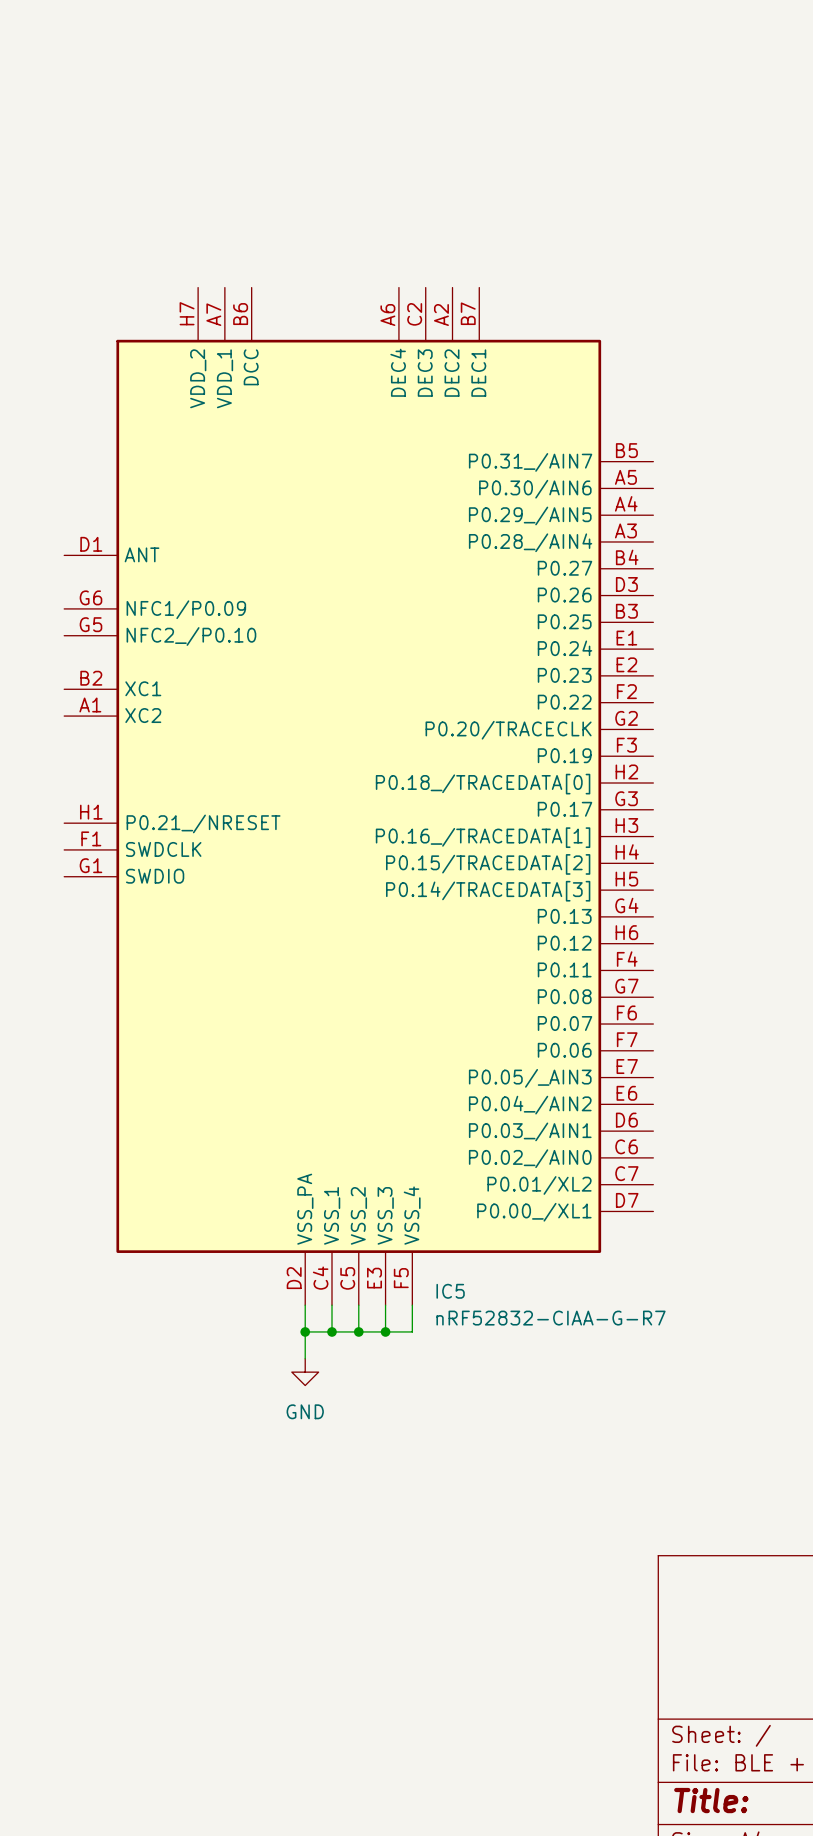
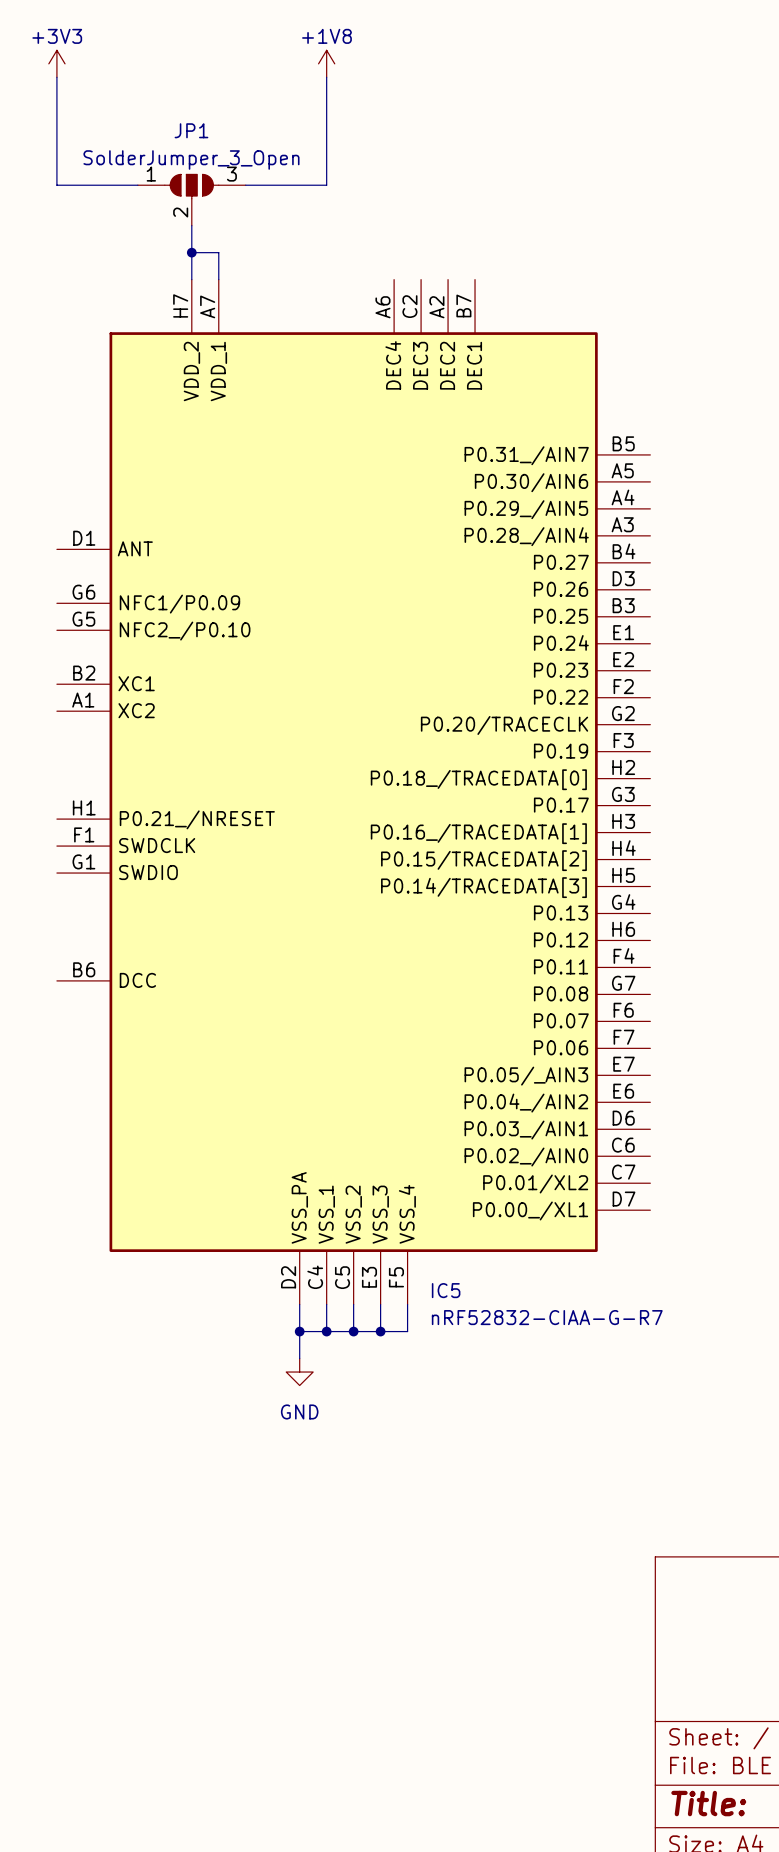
power symbol: none -> +3V3 (56, 63)
power symbol: none -> +1V8 (326, 63)
wire: none -> (56, 77) (56, 185) (137, 185)
wire: none -> (326, 77) (326, 185) (245, 185)
JP1: none -> SolderJumper_3_Open (191, 200)
wire: none -> (191, 225) (191, 279)
wire: none -> (191, 252) (218, 252) (218, 279)
junction: none -> (191, 252)
IC5 symbol: [64, 287, 654, 1306] -> [56, 279, 651, 1305]

